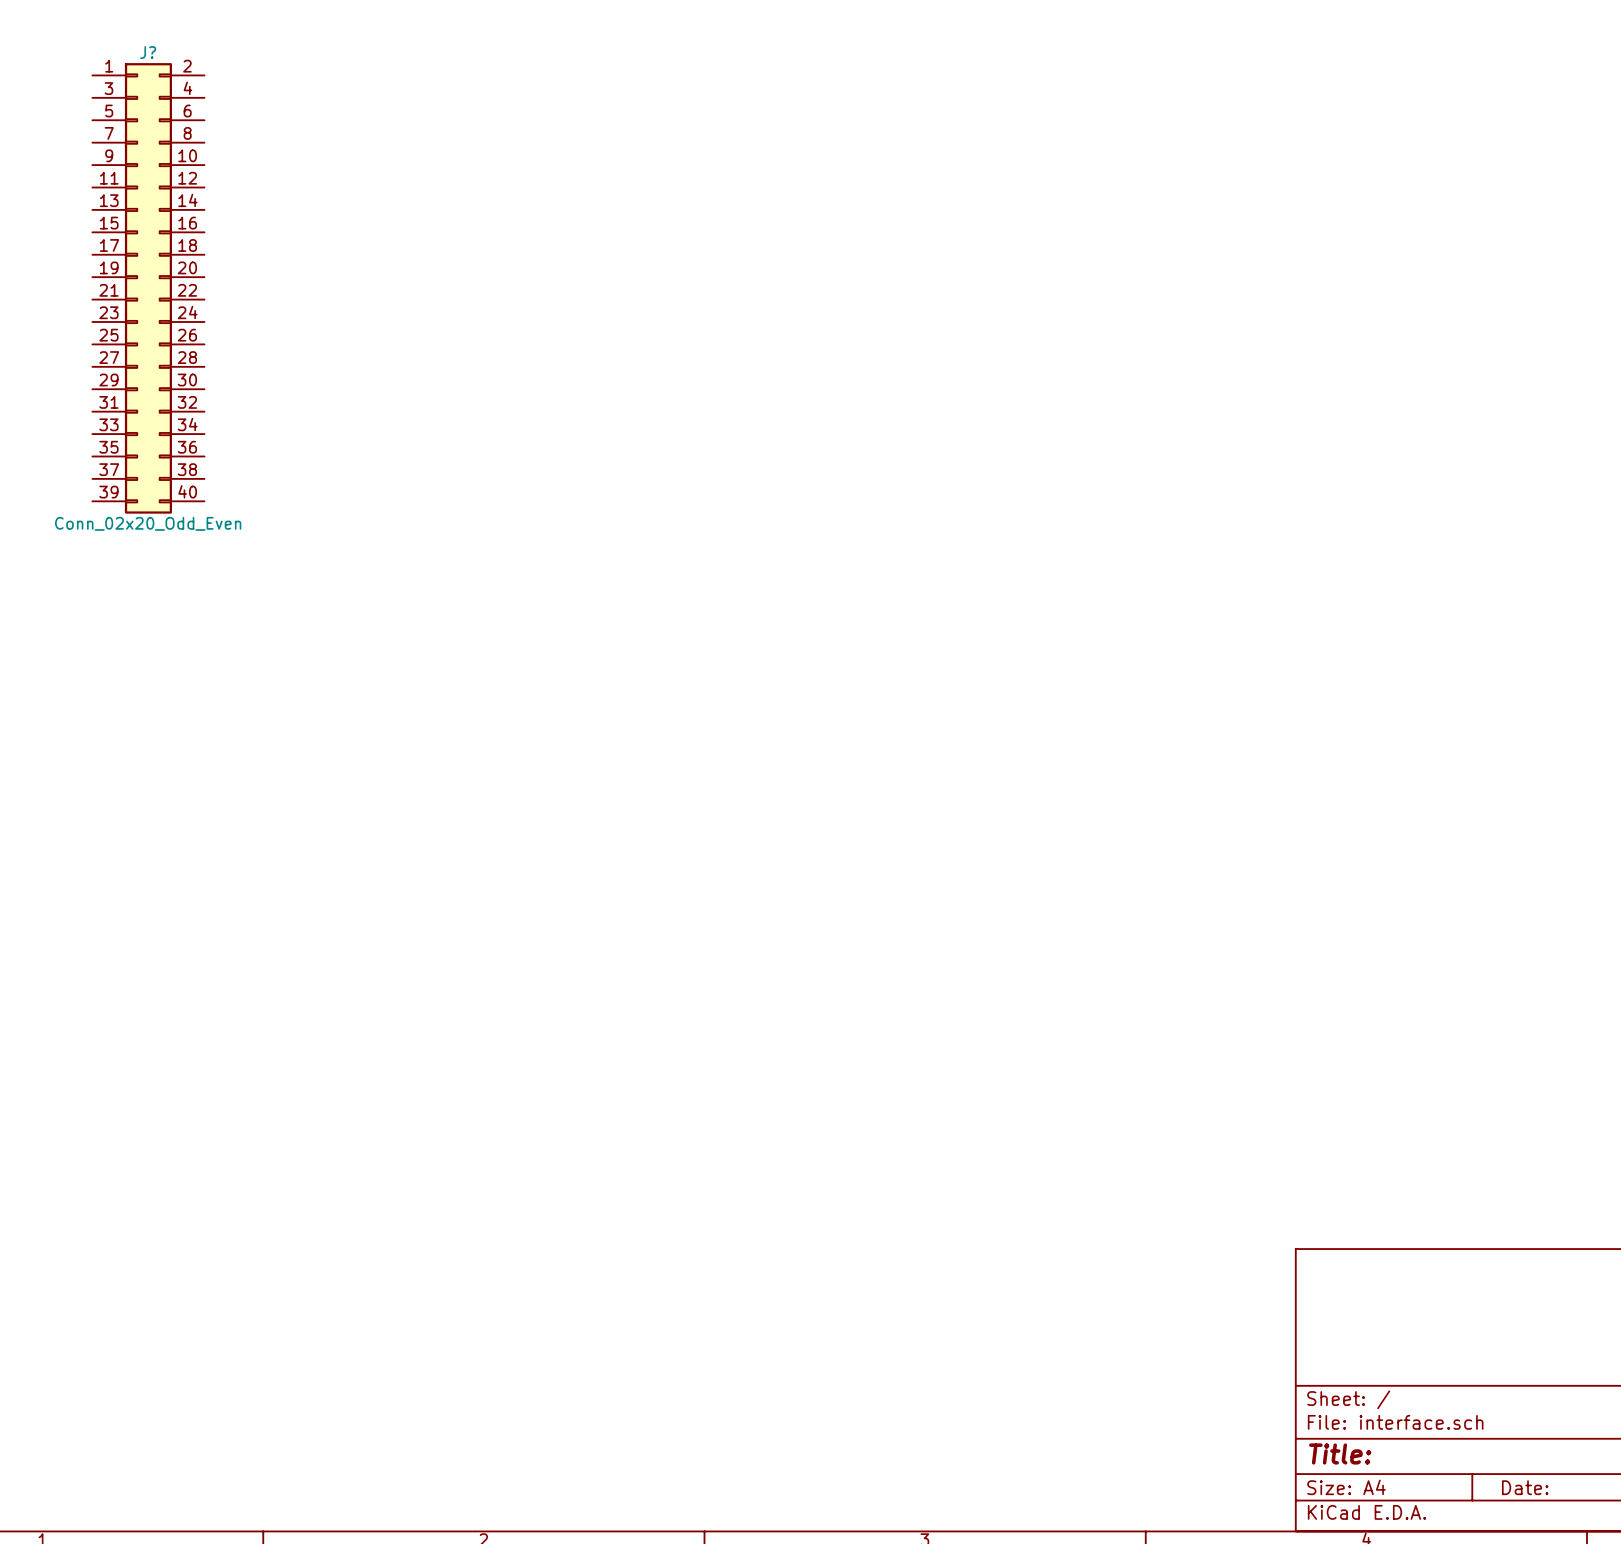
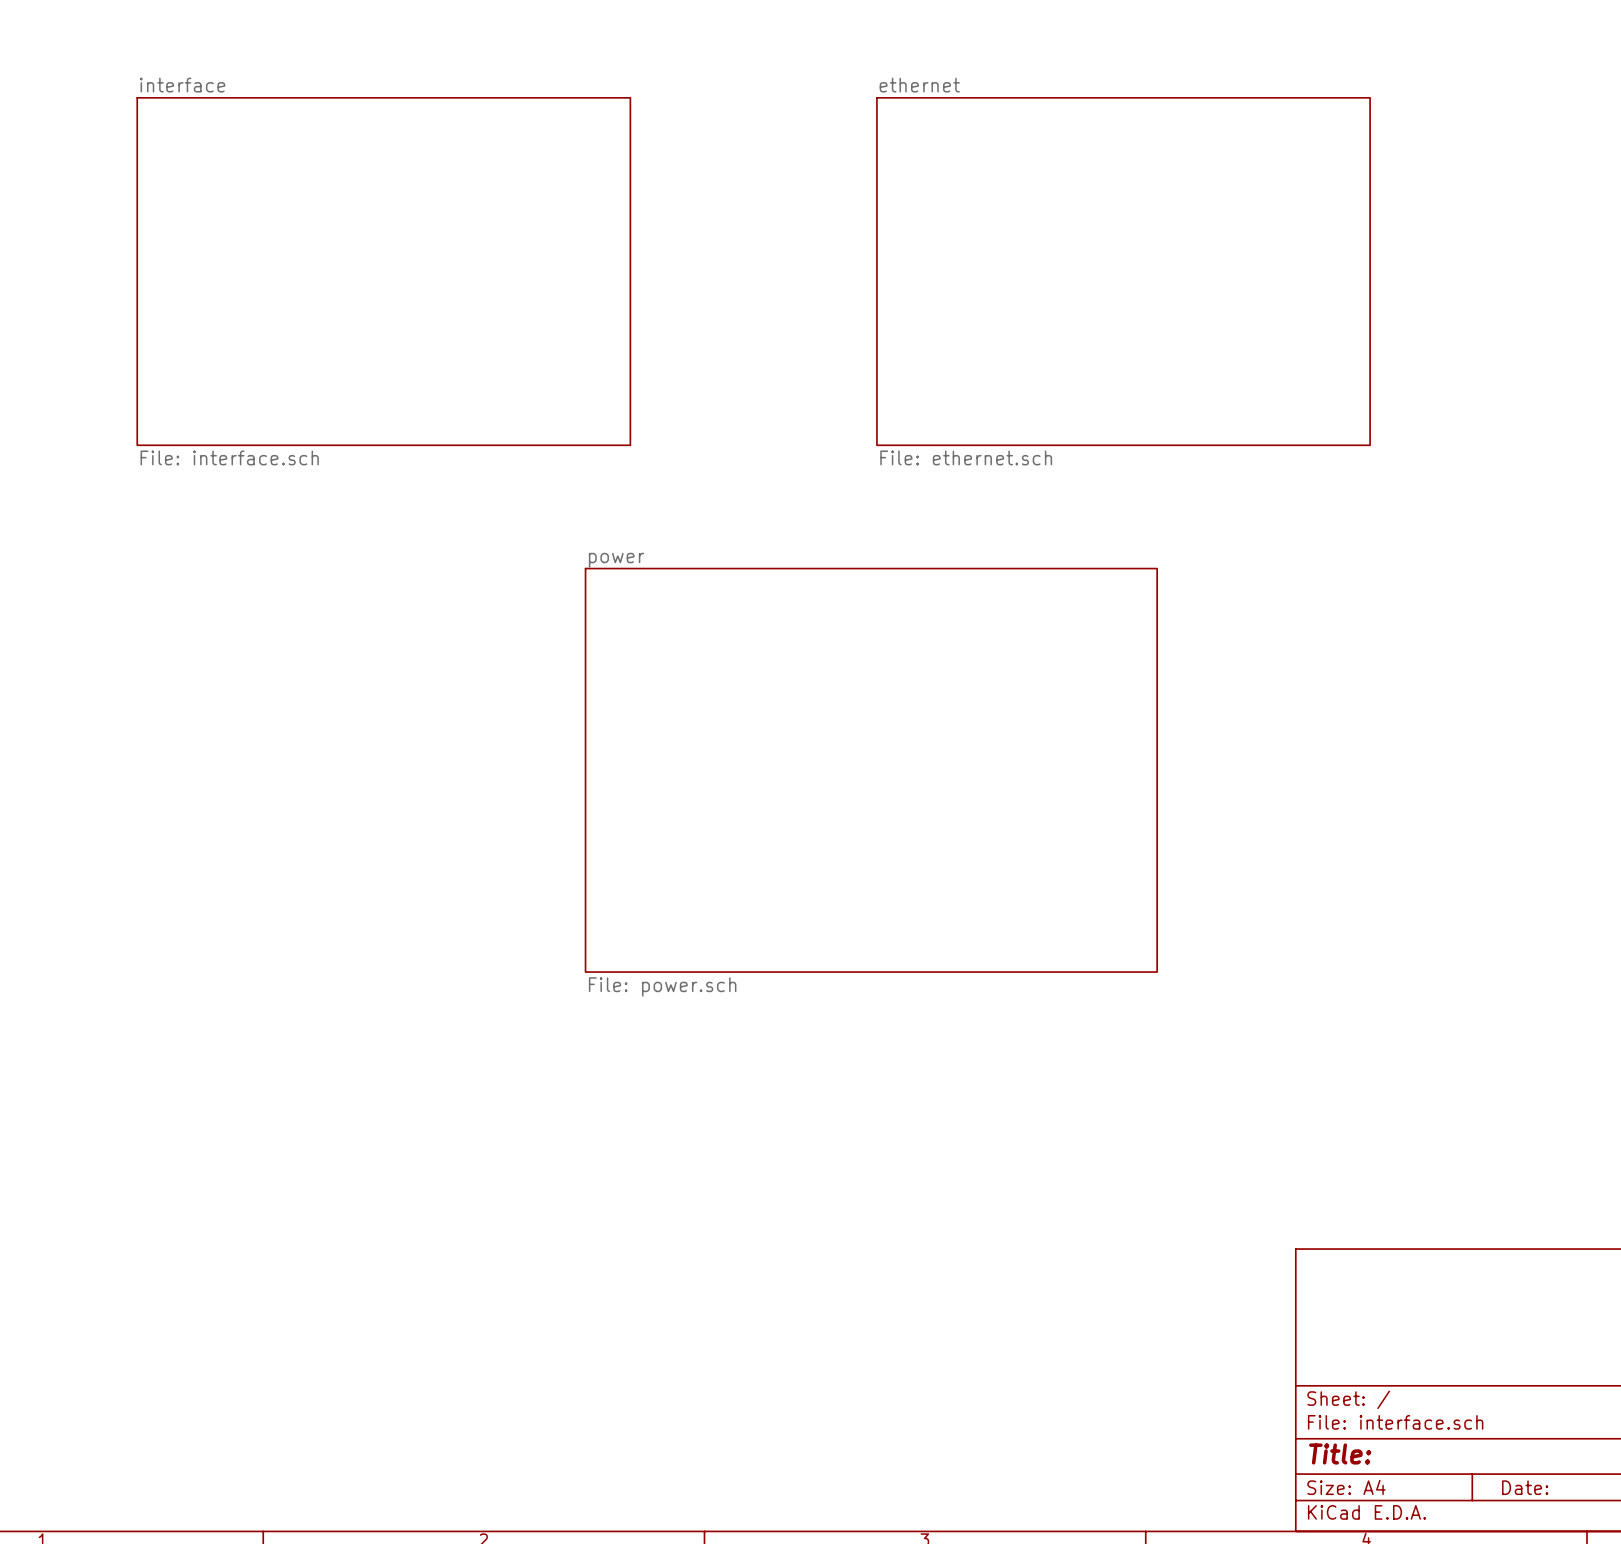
sheet interface: none -> File: interface.sch (383, 271)
sheet ethernet: none -> File: ethernet.sch (1123, 271)
J?: Conn_02x20_Odd_Even (148, 288) -> none
sheet power: none -> File: power.sch (871, 770)

